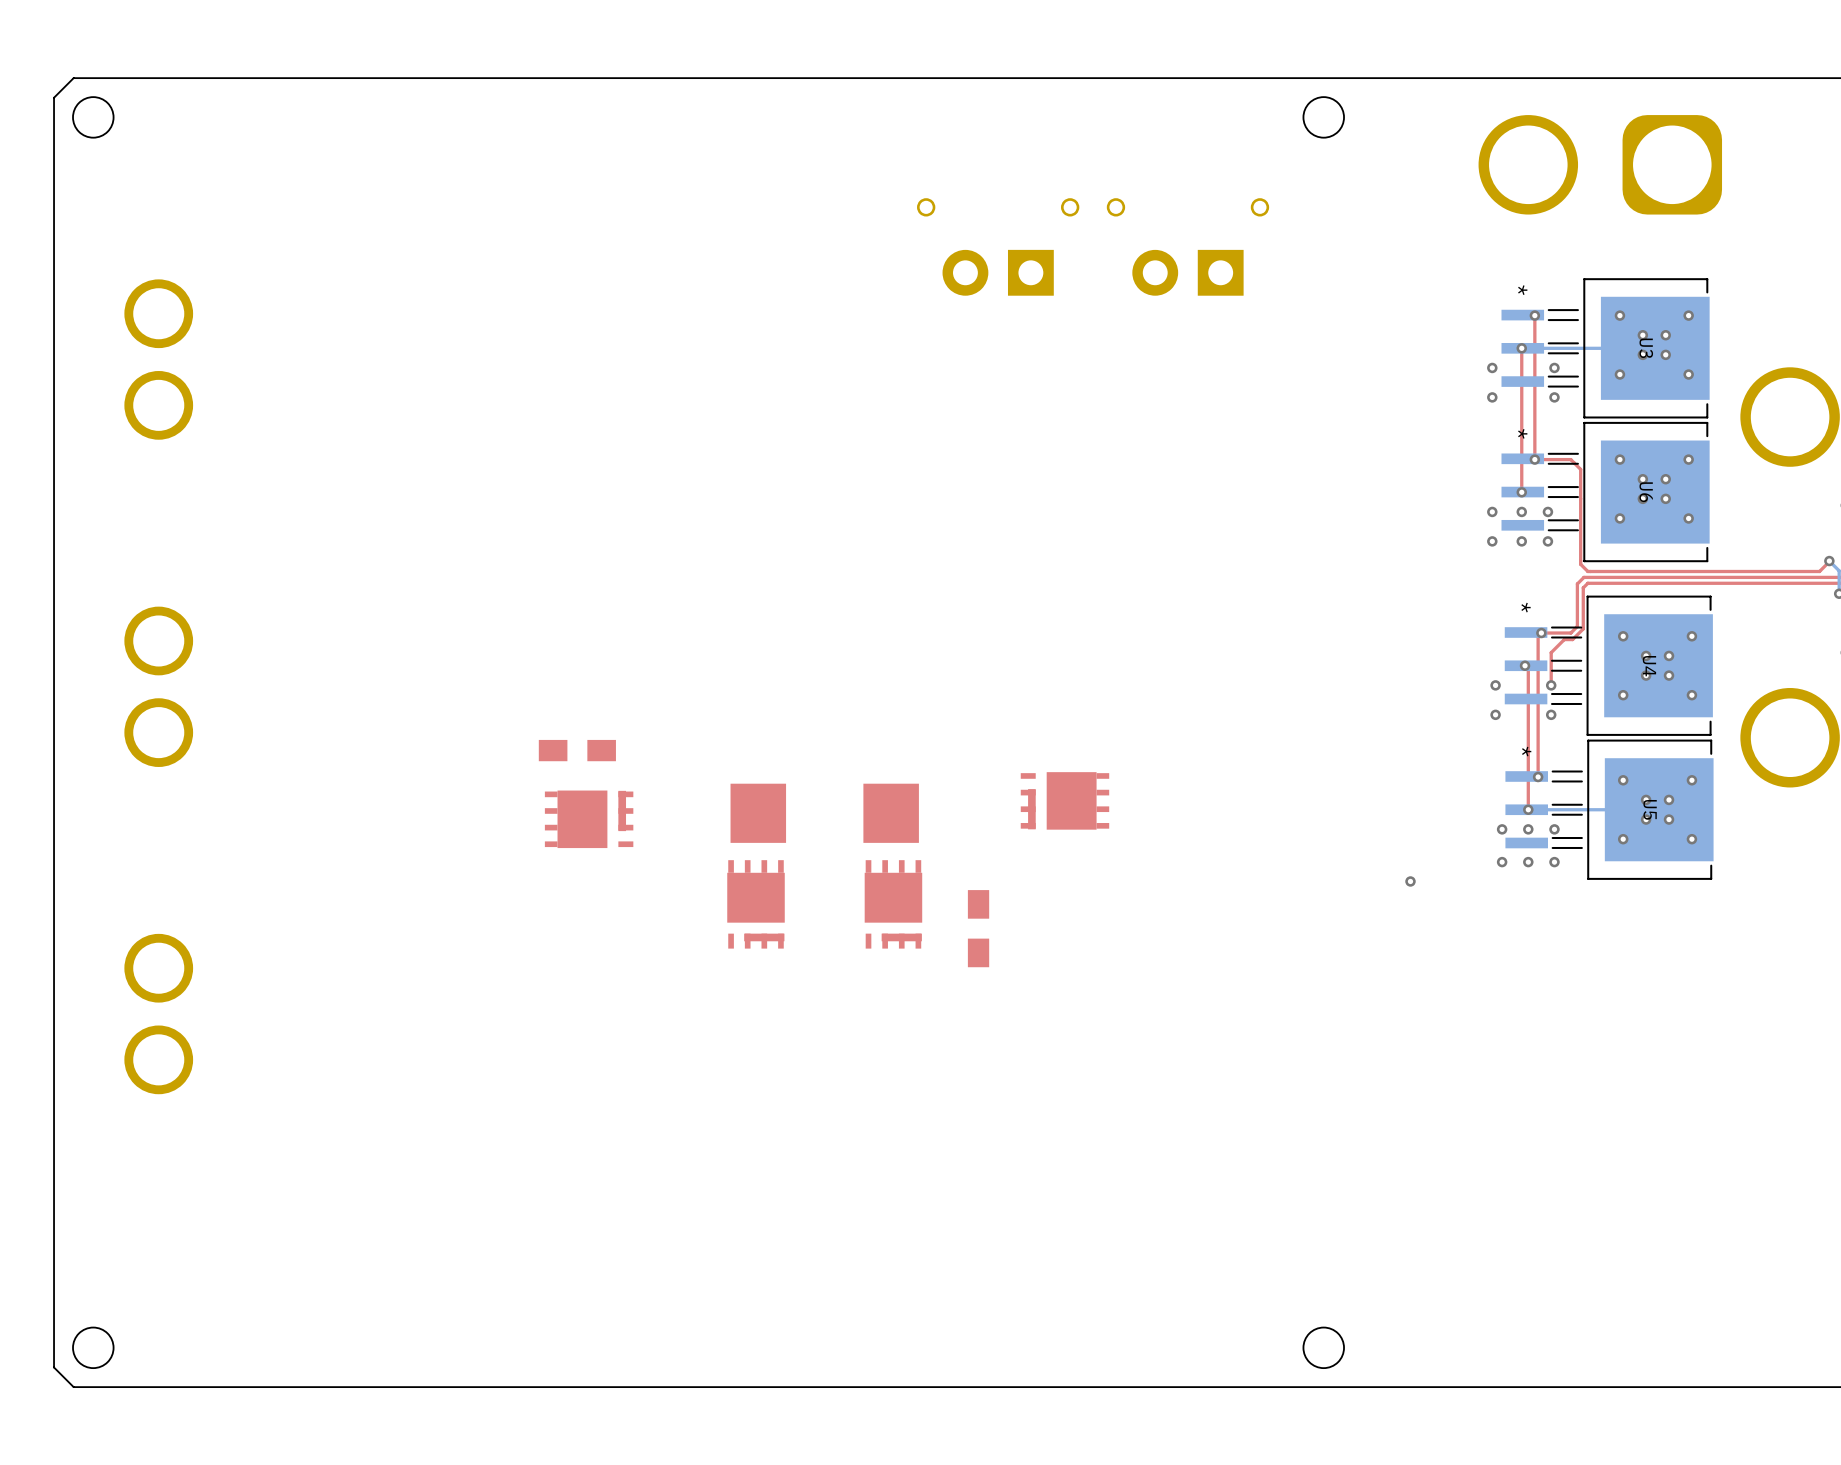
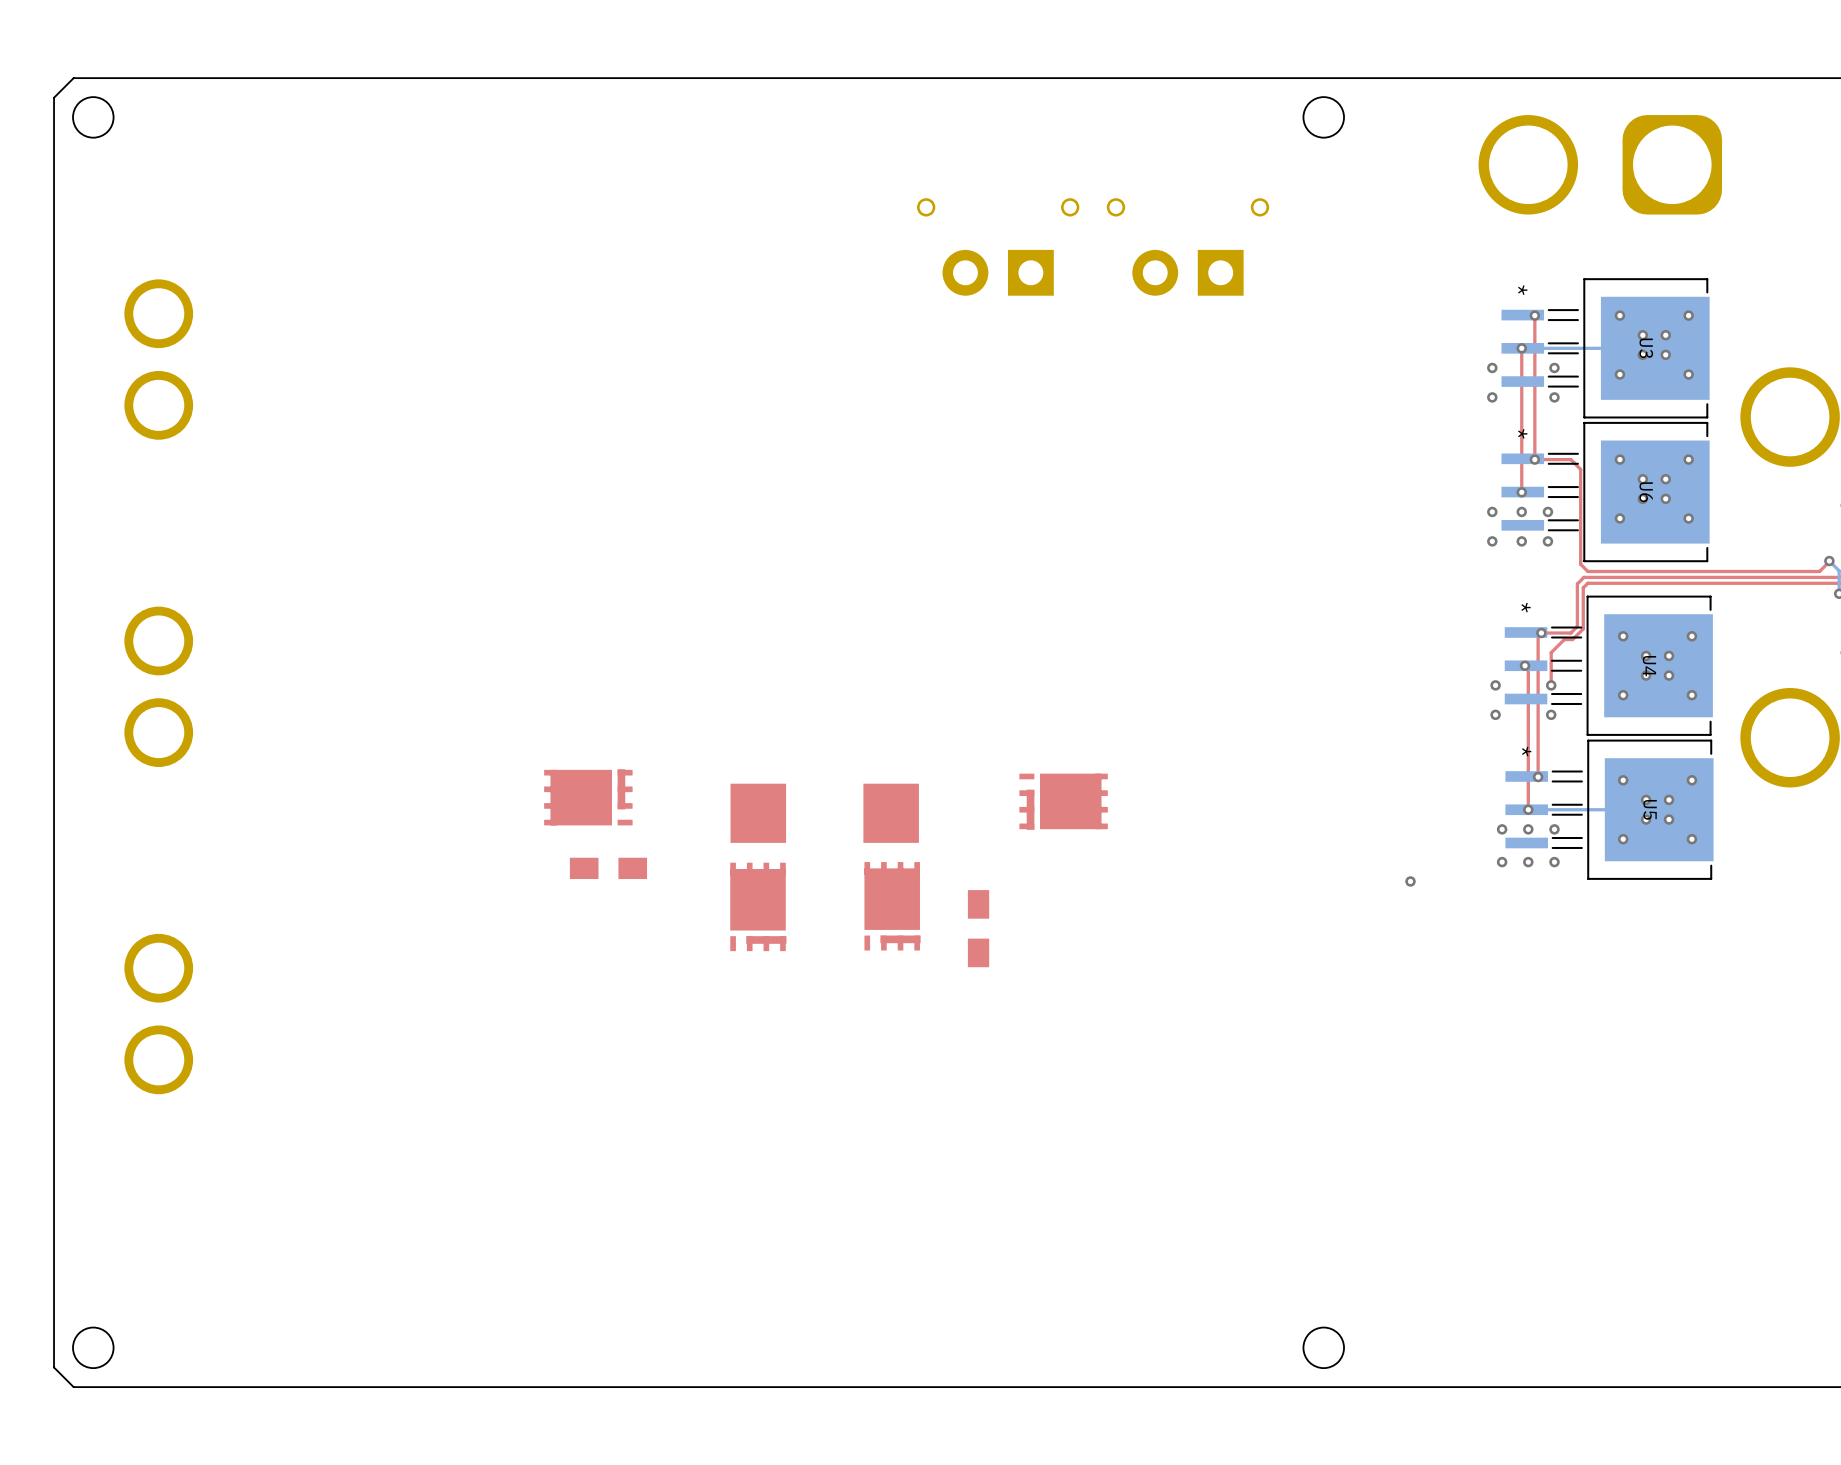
part position: (577, 750) -> (608, 868)
part footprint: [1020, 772, 1110, 830] -> [1019, 773, 1108, 830]
part: none -> (588, 797)
part: (589, 819) -> none
part footprint: [727, 860, 785, 949] -> [730, 862, 787, 952]
part footprint: [864, 860, 923, 949] -> [864, 862, 921, 951]

